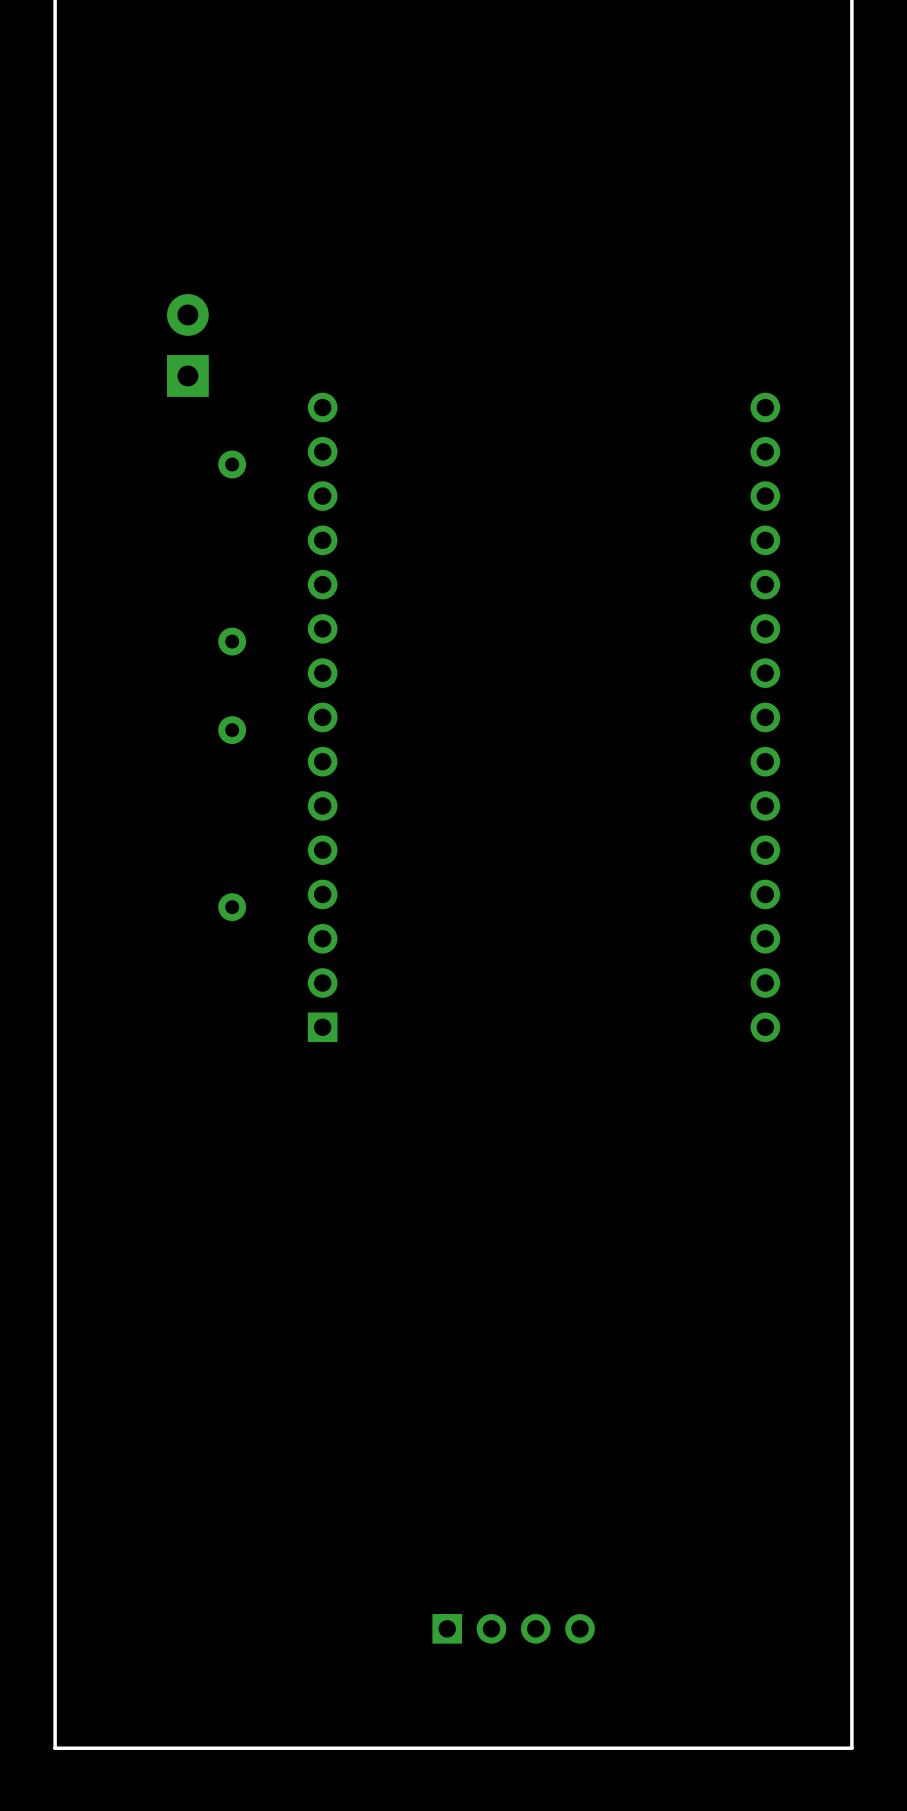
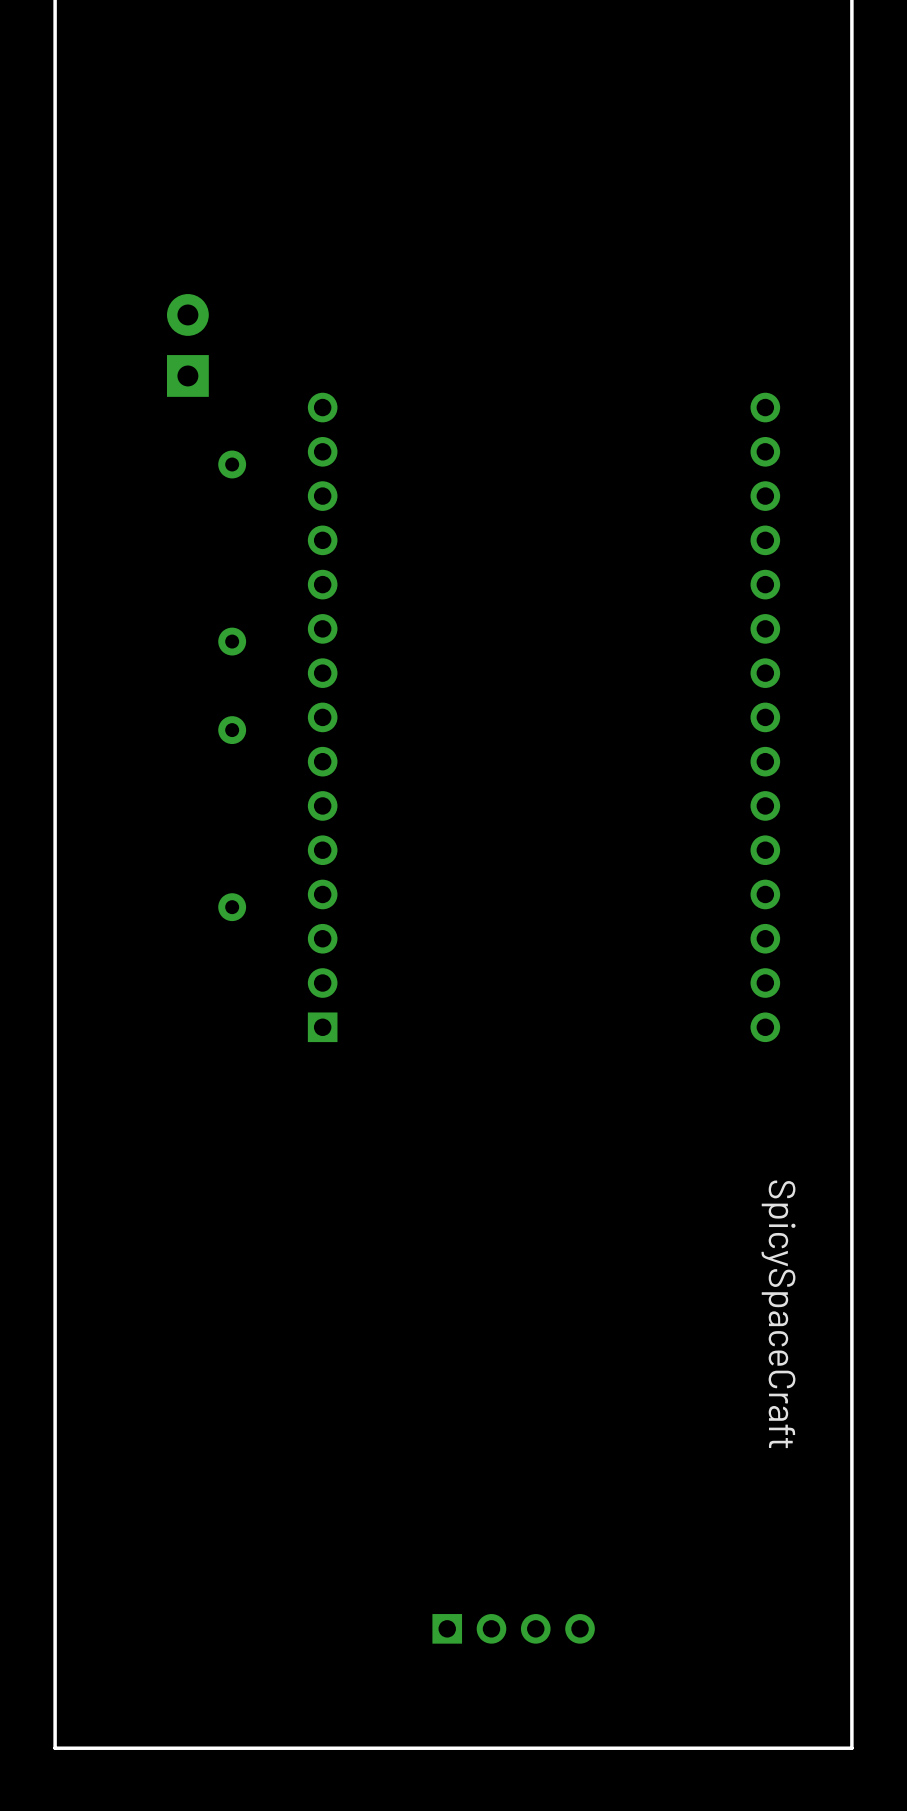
text: none -> SpicySpaceCraft (778, 1314)

